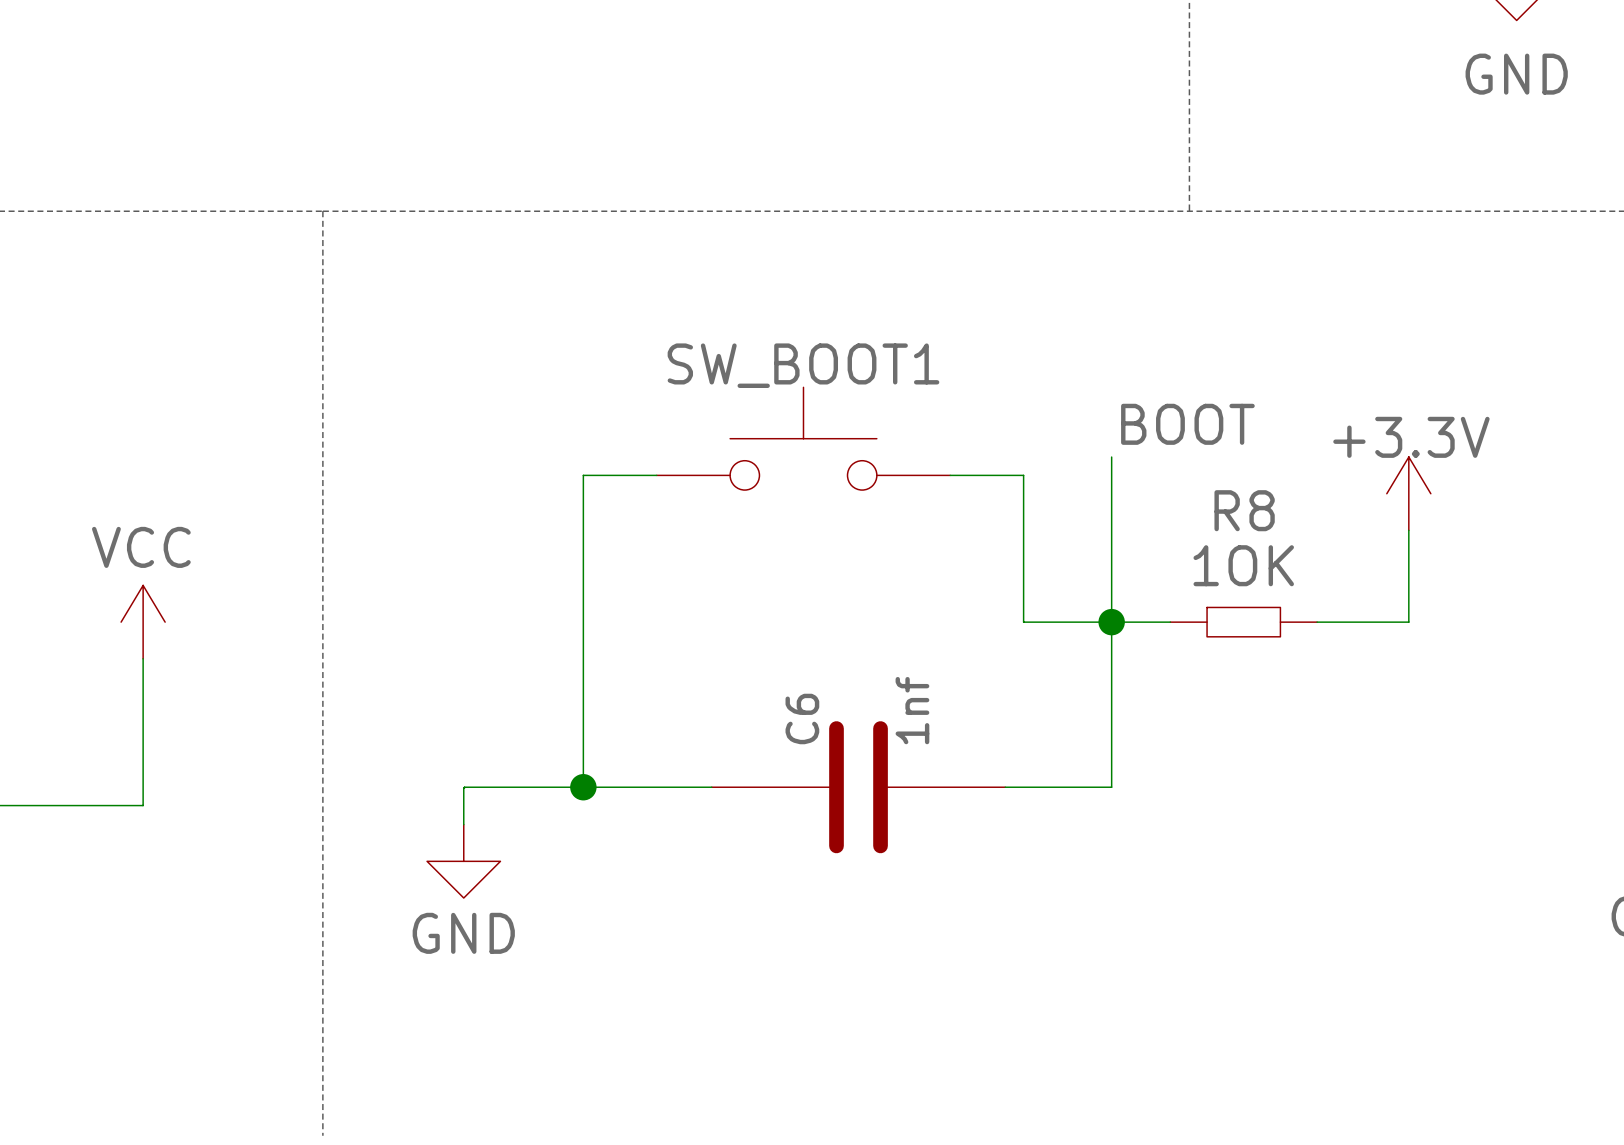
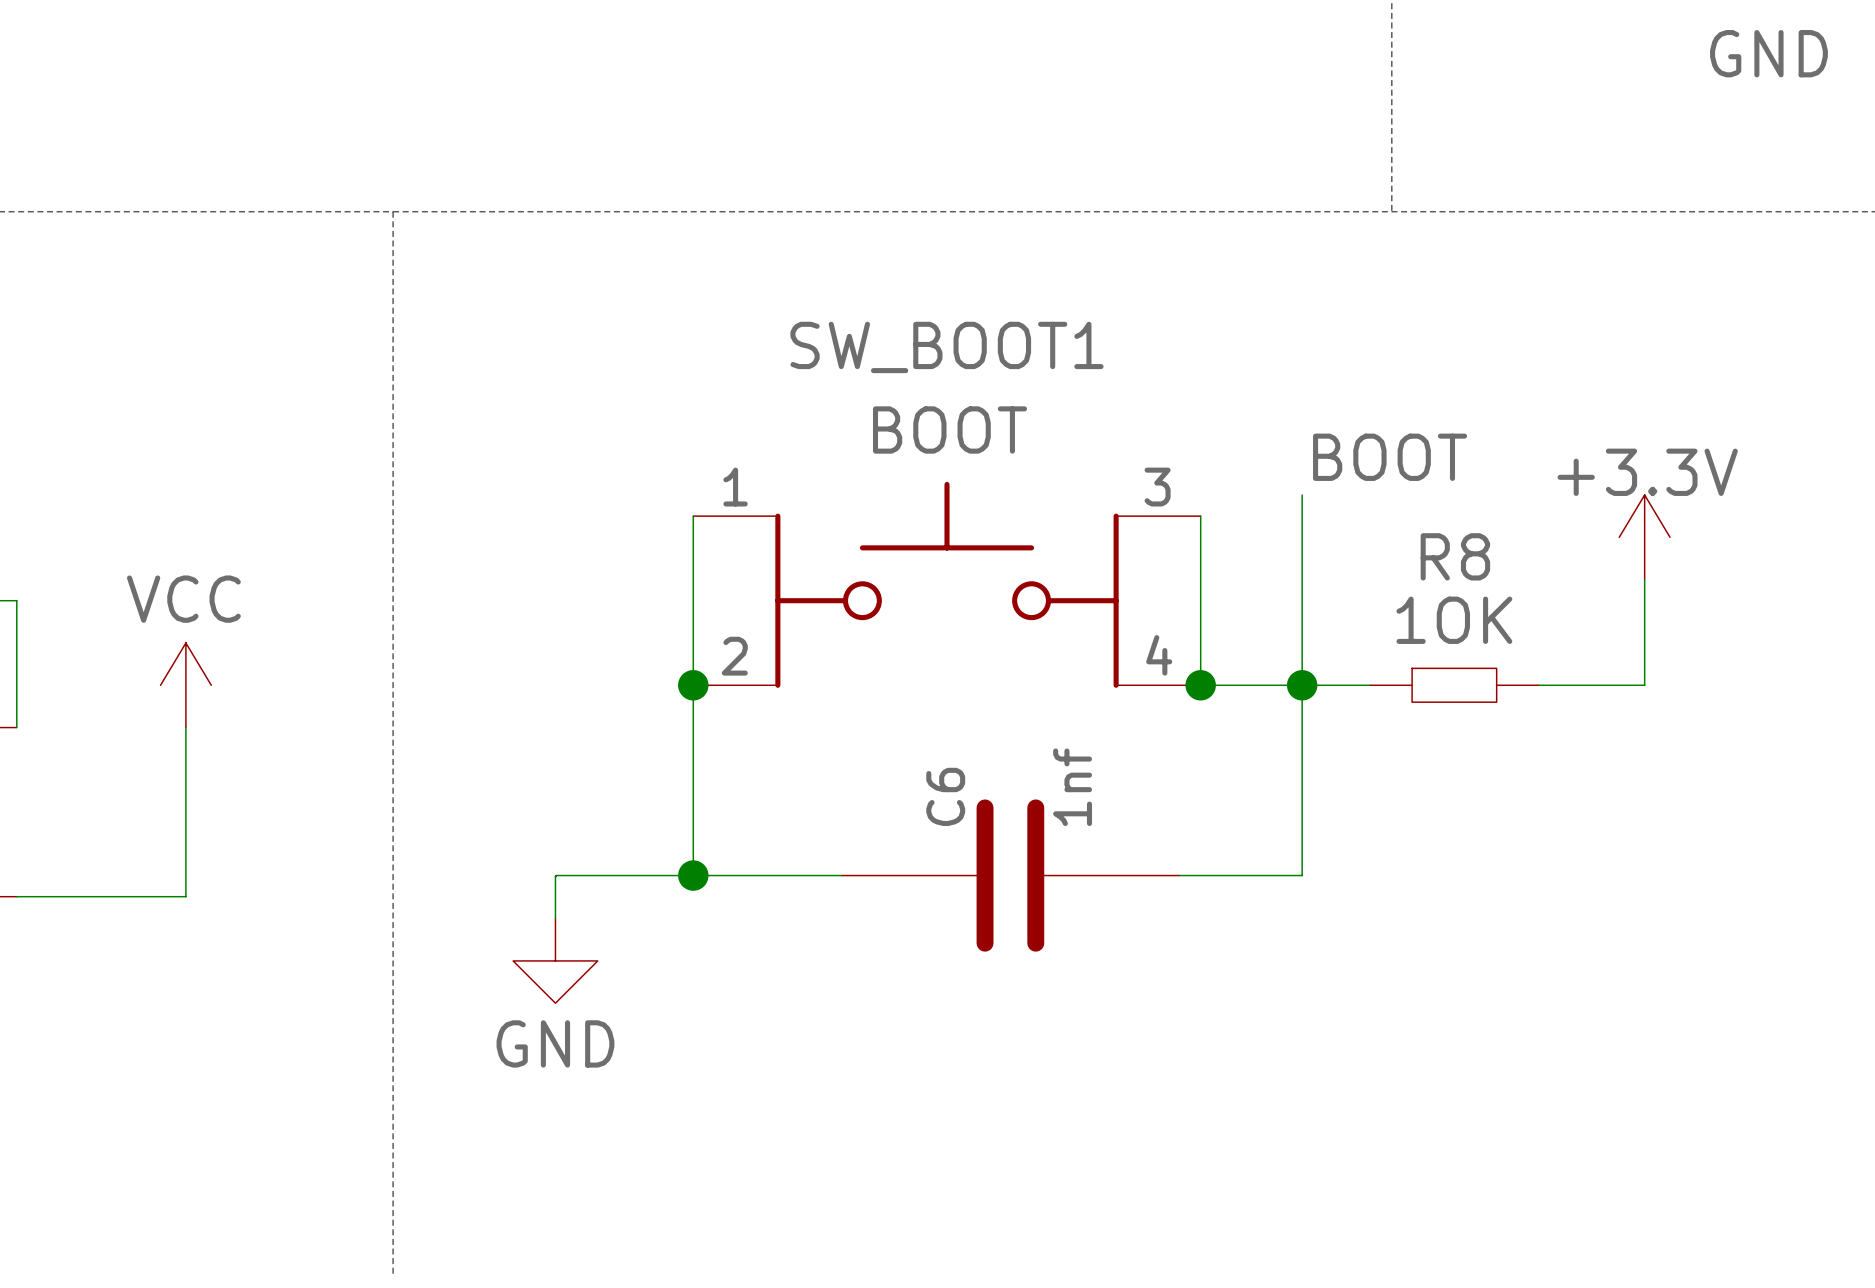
SW_BOOT1 name position: SW_BOOT1 (803, 365) -> SW_BOOT1 (946, 347)
SW_BOOT1 symbol: [656, 387, 951, 491] -> [693, 481, 1201, 688]
SW_BOOT1 value: none -> BOOT (950, 430)
junction: none -> (693, 685)
junction: none -> (1200, 685)

